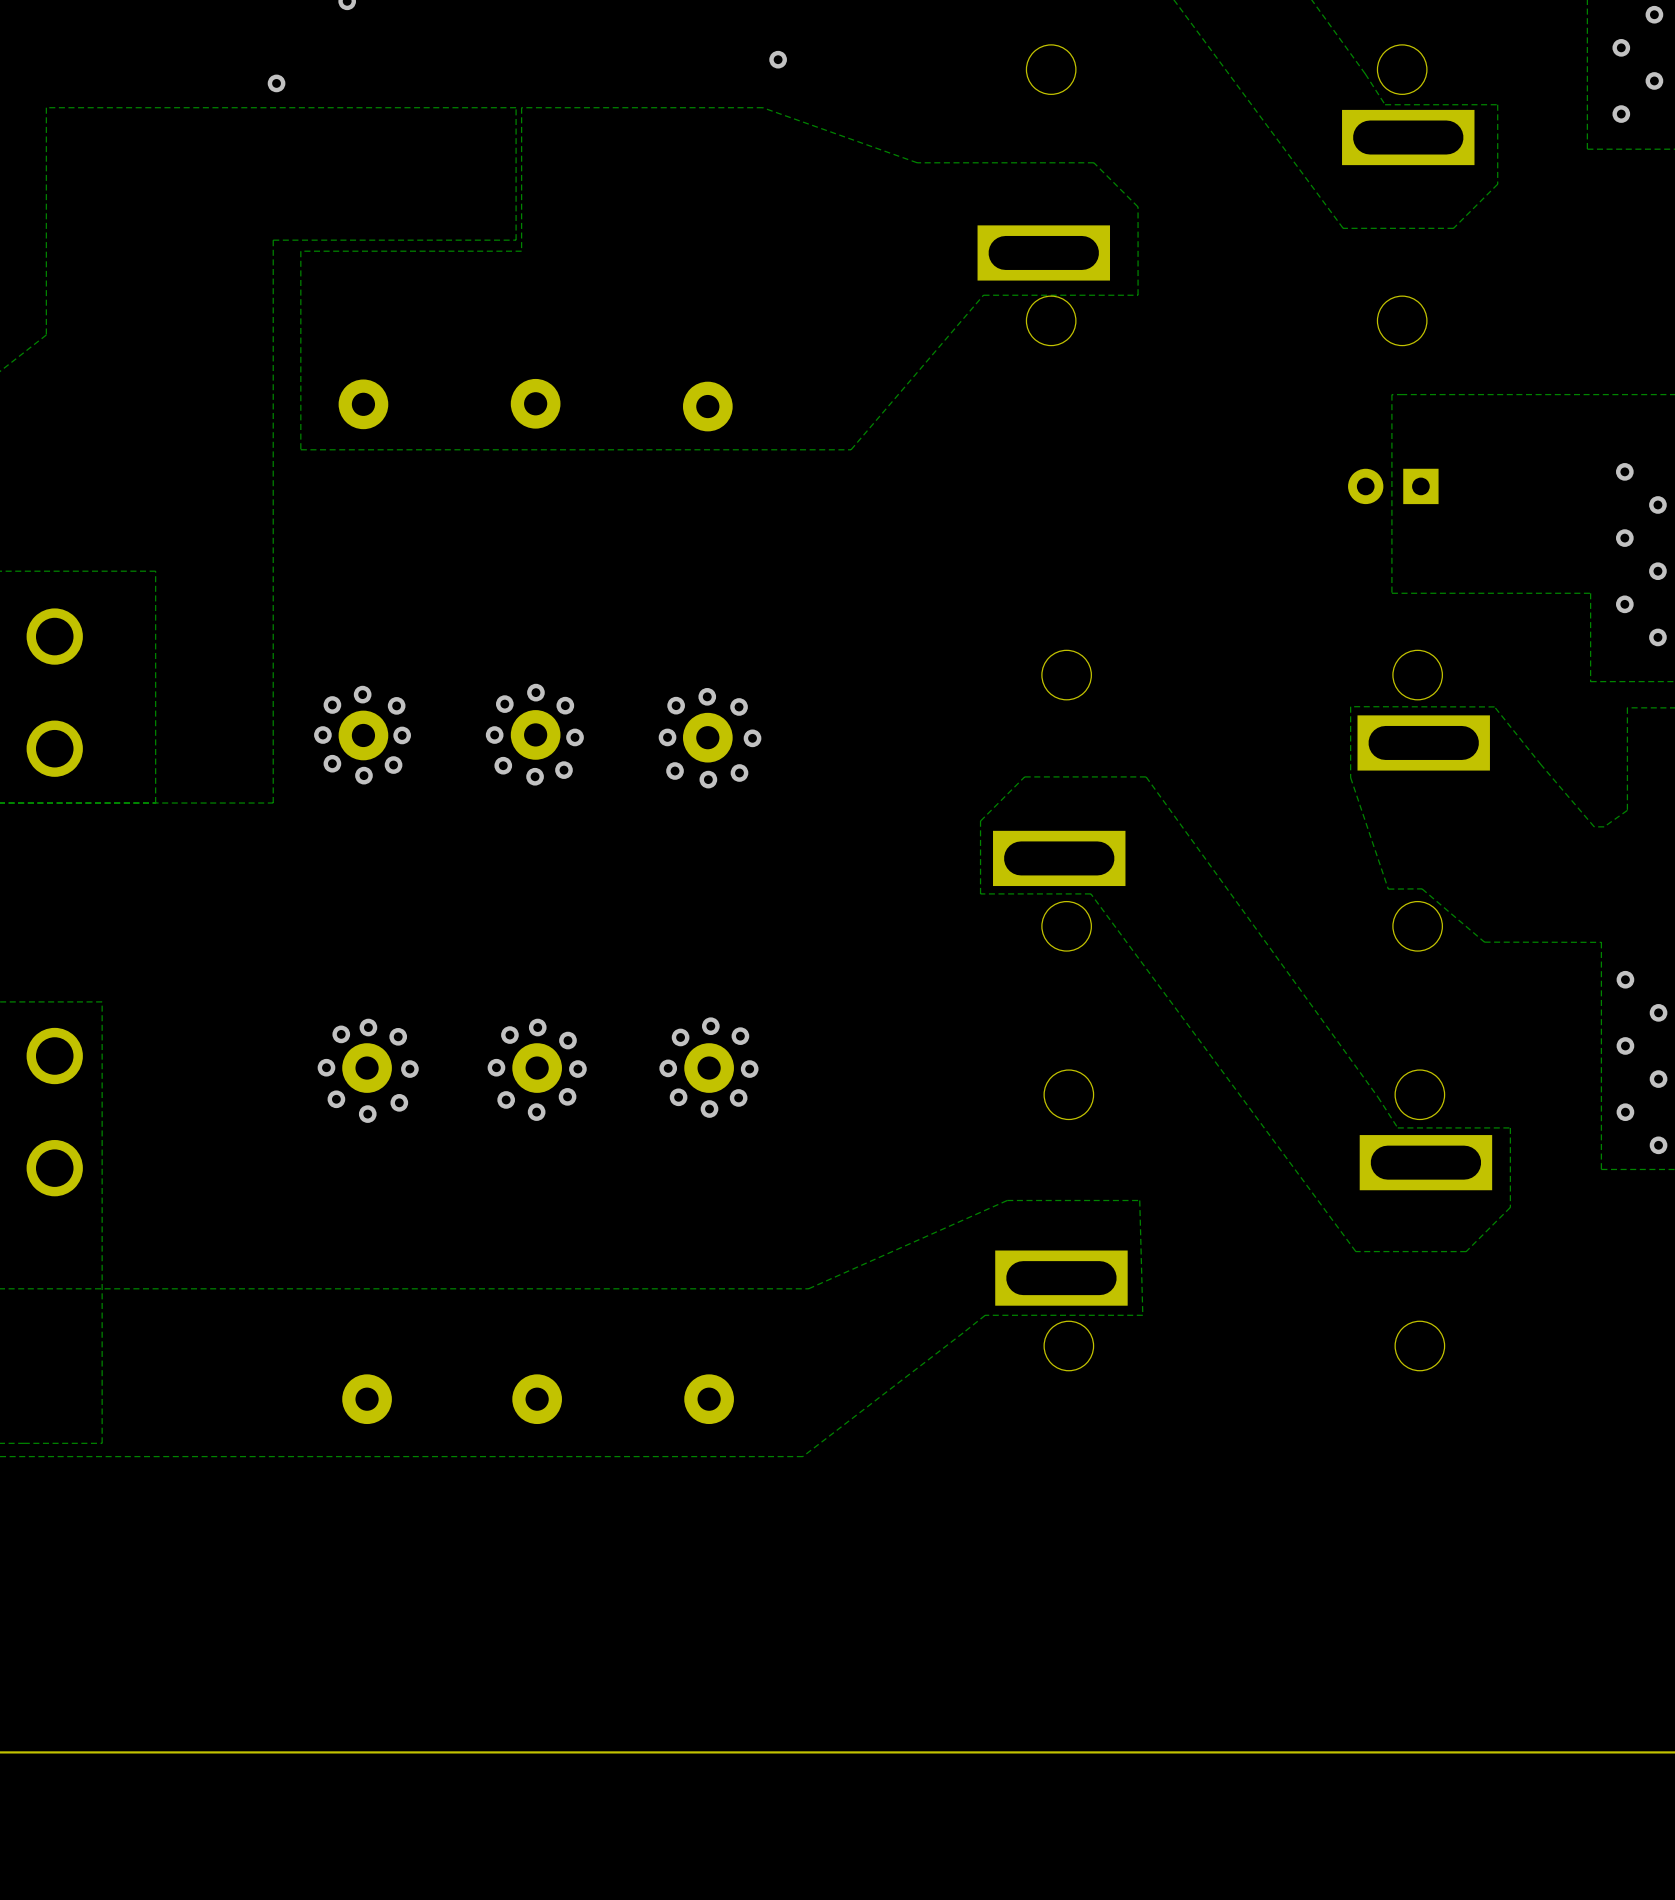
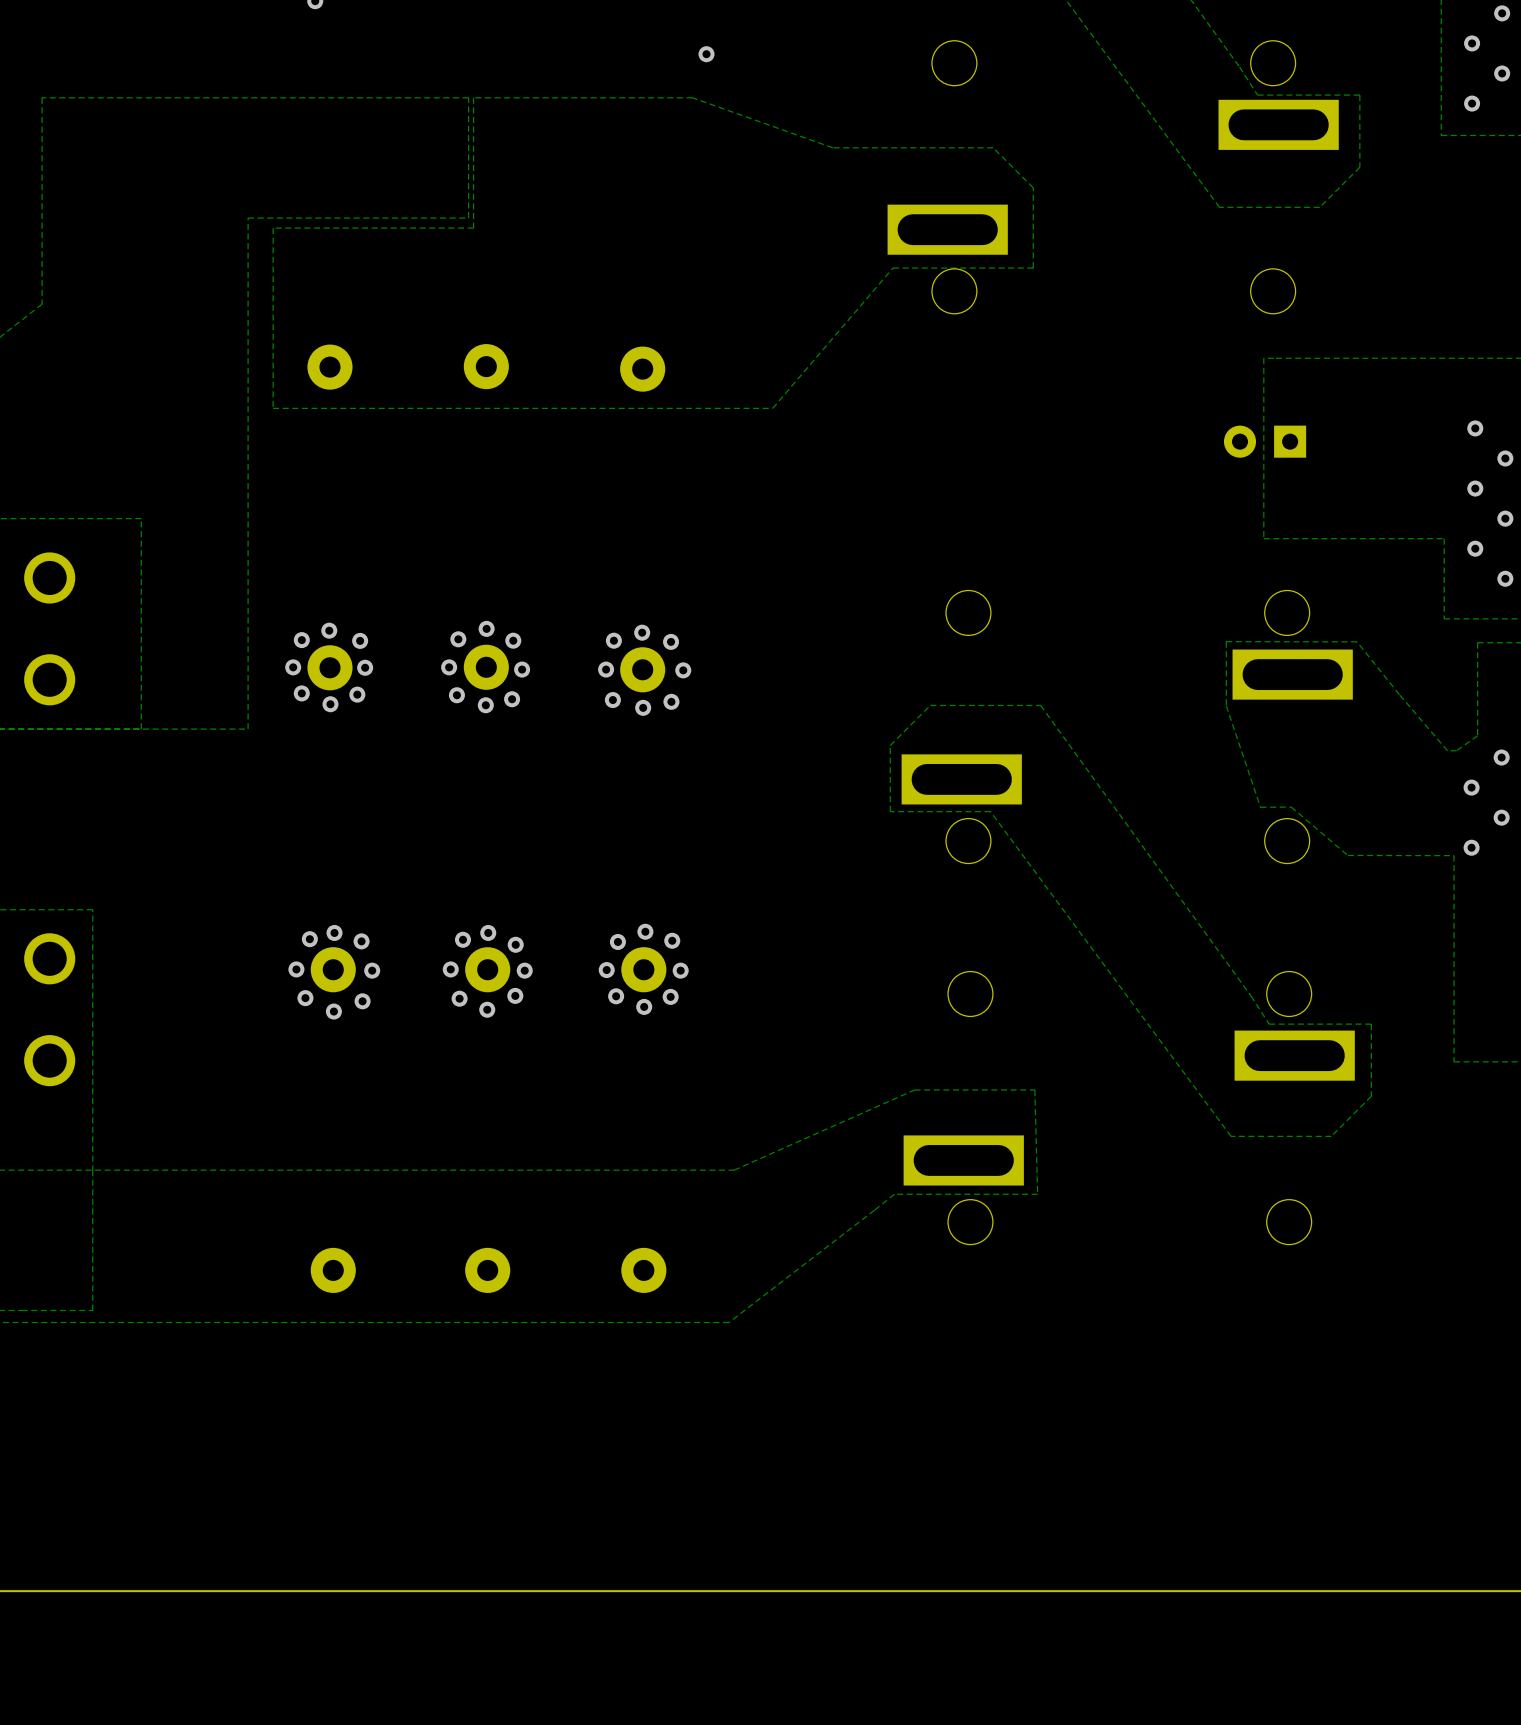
via: (276, 83) -> none
via: none -> (1501, 757)
via: none -> (1471, 787)
via: none -> (1501, 817)
via: none -> (1471, 847)
via: (1625, 979) -> none
via: (1658, 1012) -> none
via: (1625, 1045) -> none
via: (1658, 1079) -> none
via: (1625, 1112) -> none
via: (1658, 1145) -> none

